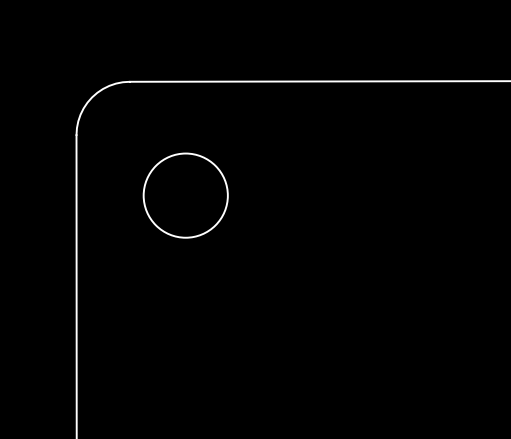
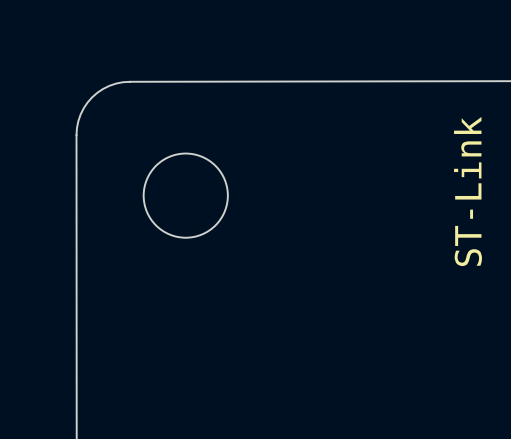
text: none -> ST-Link (468, 191)

